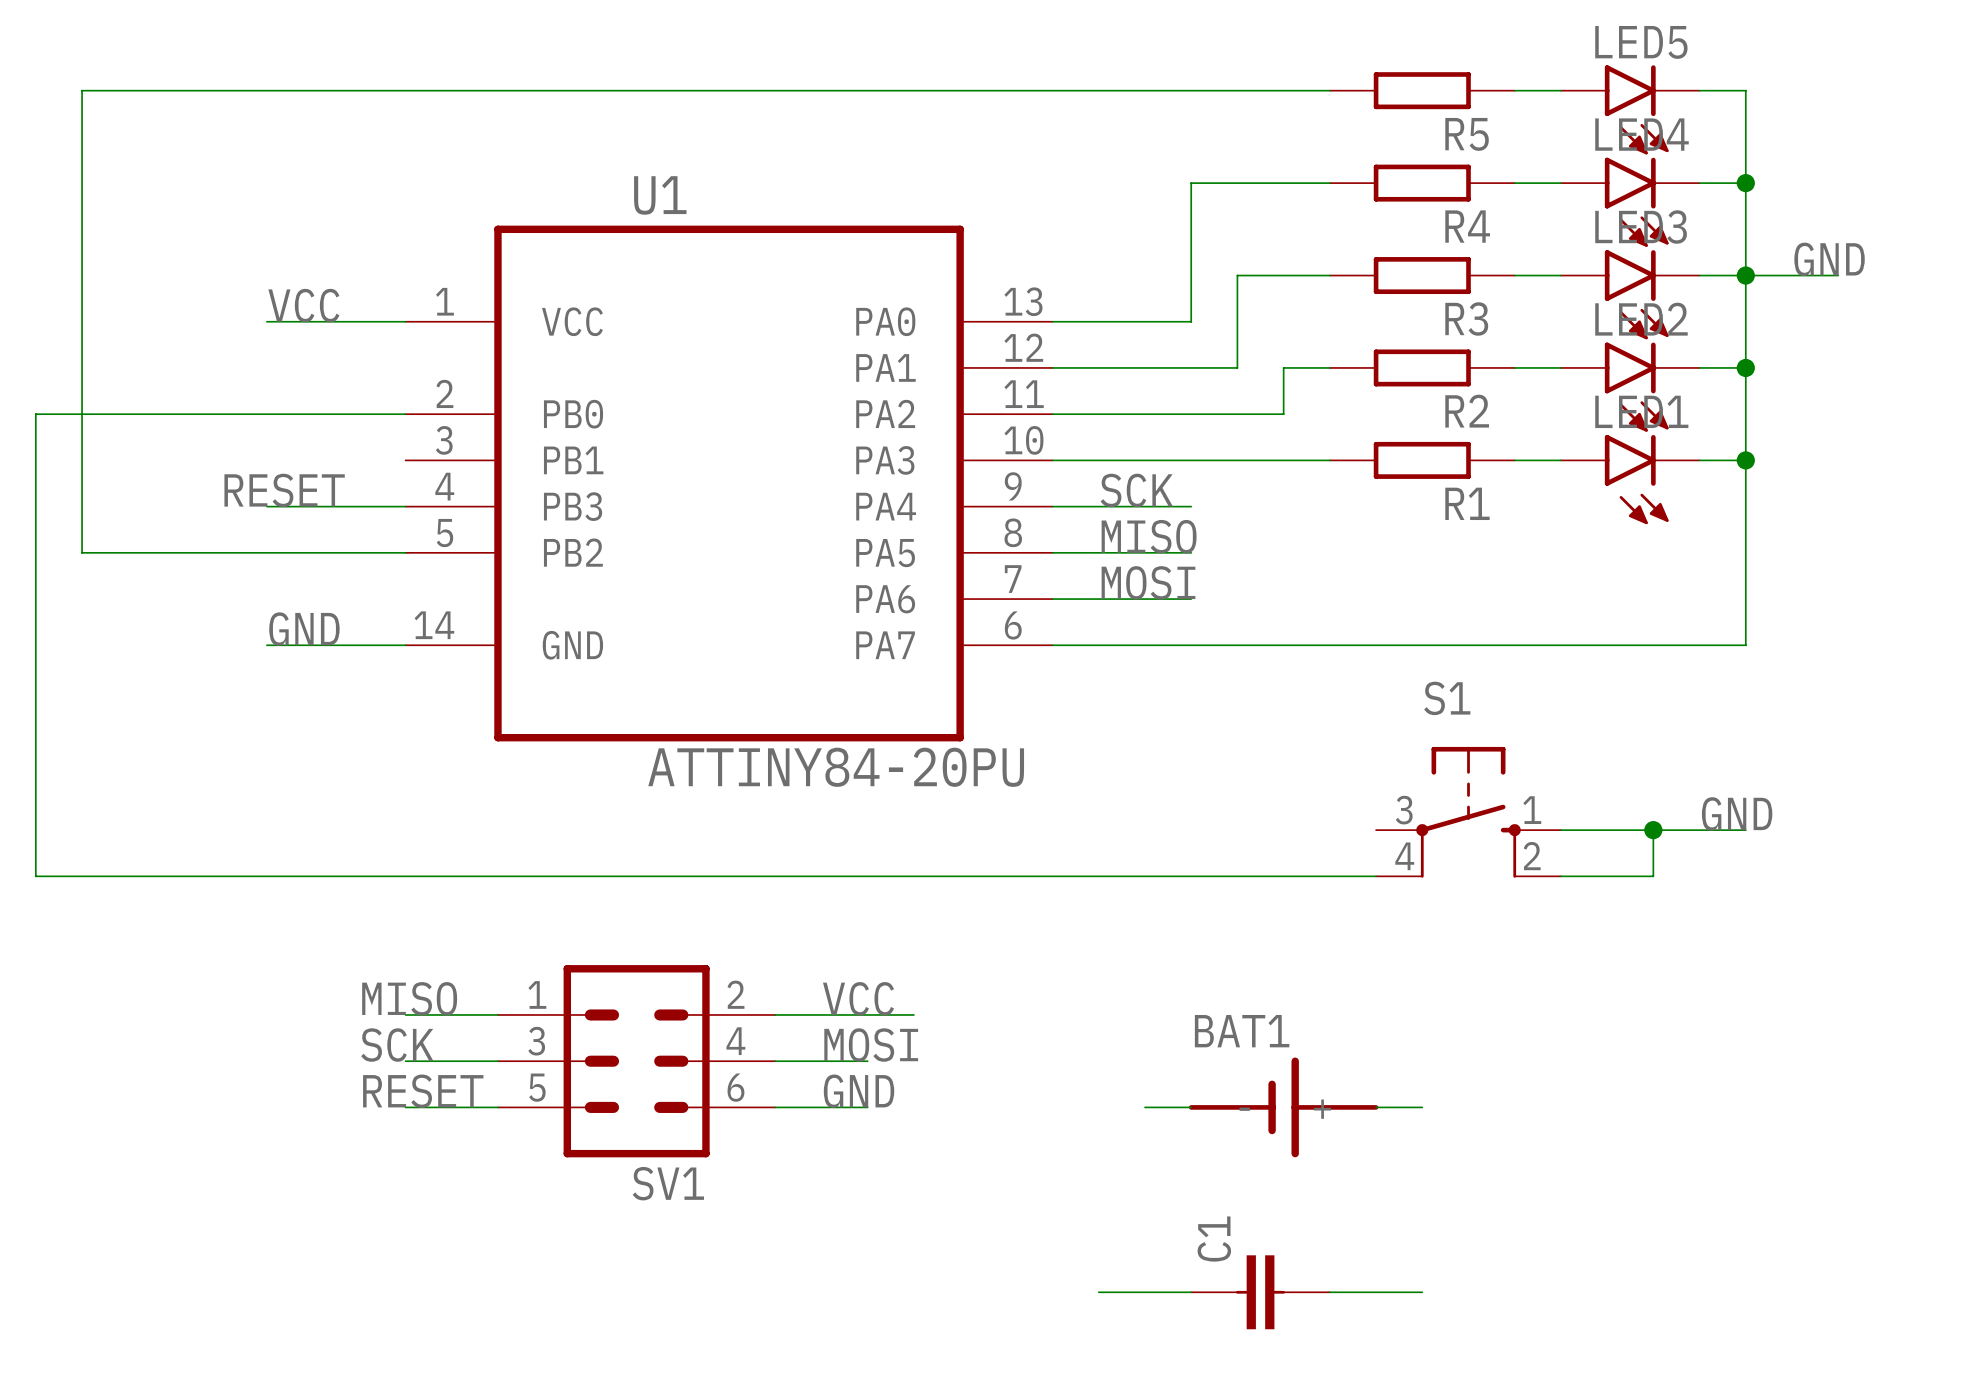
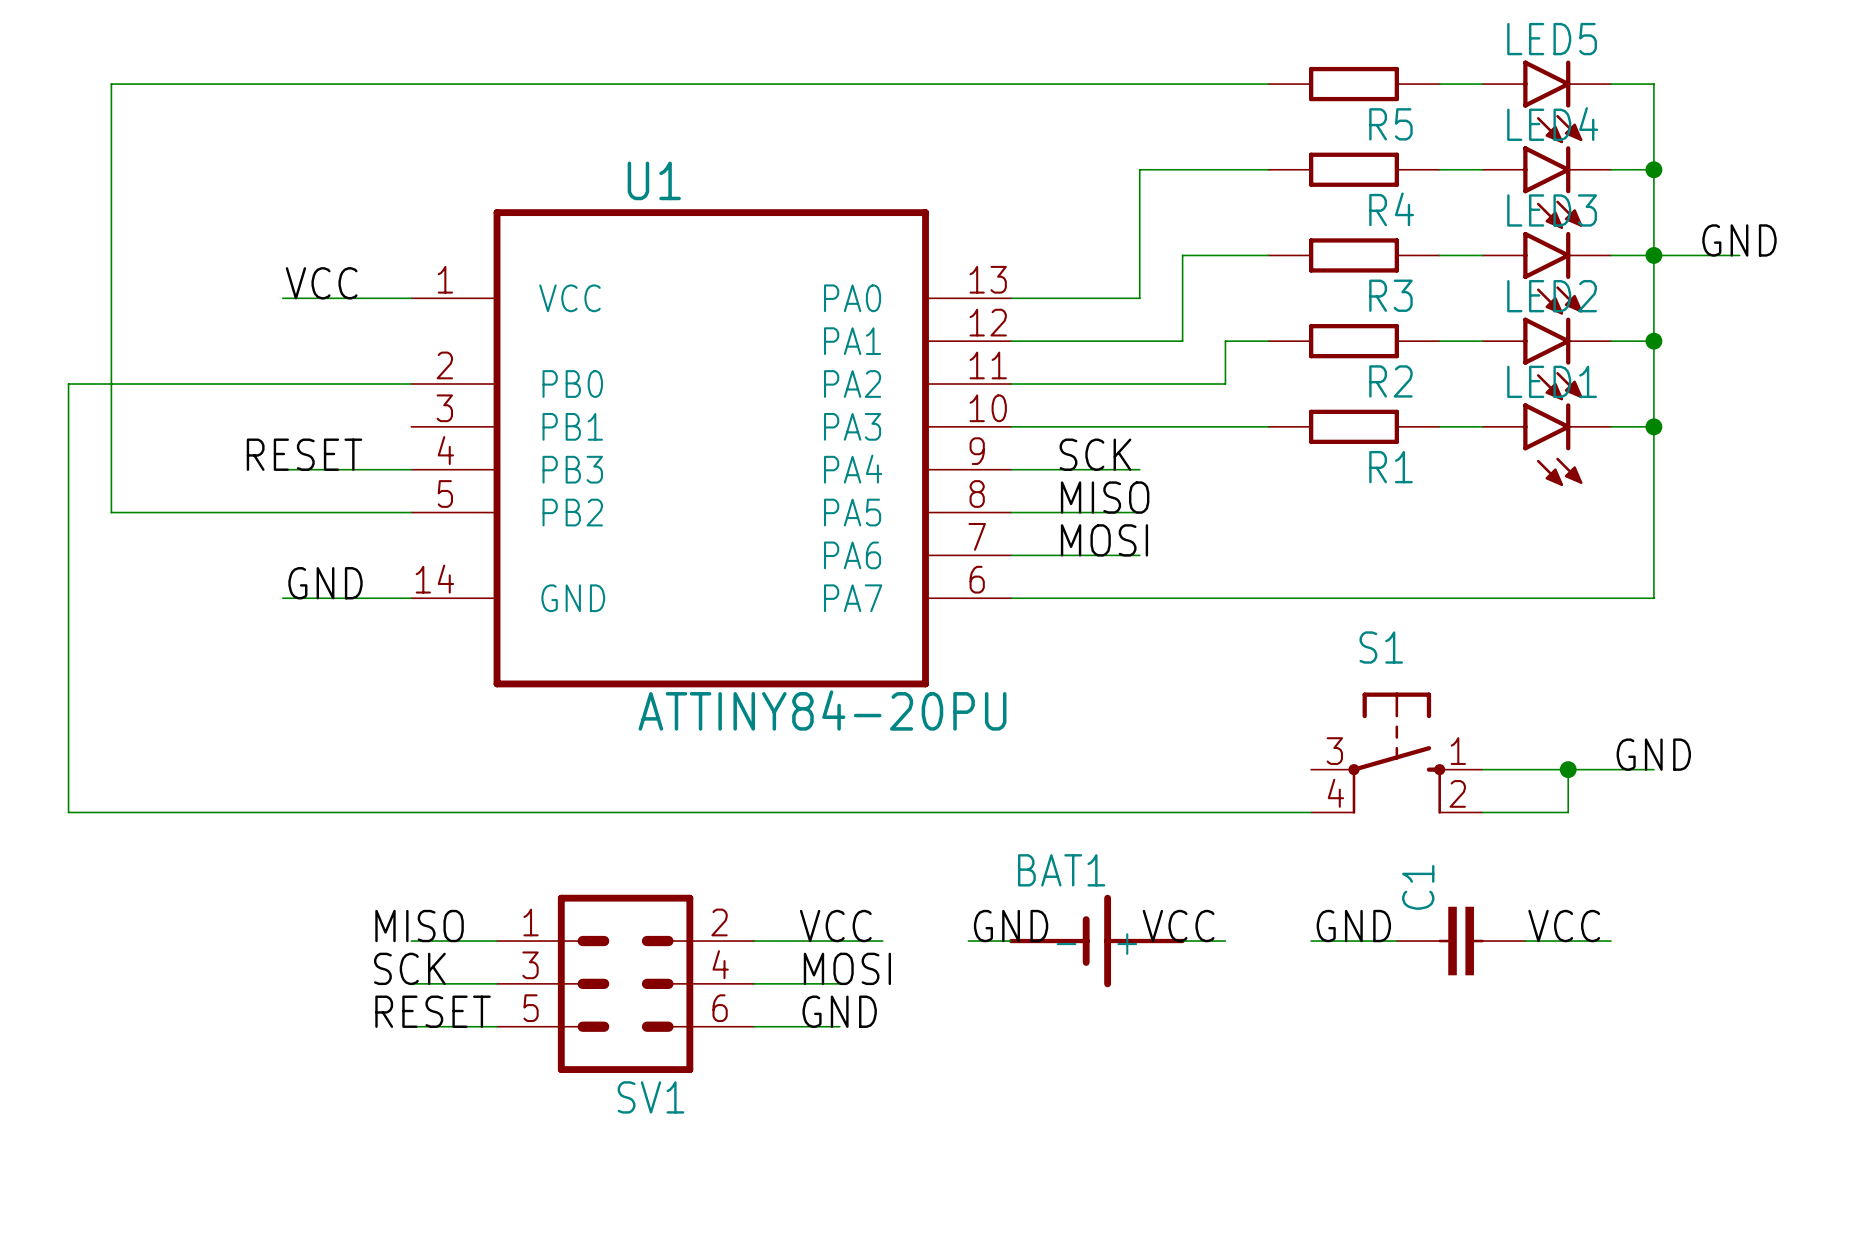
label: none -> GND (1011, 926)
label: none -> VCC (1178, 926)
label: none -> GND (1353, 926)
label: none -> VCC (1564, 926)
wire: (1144, 1107) (1191, 1107) -> (968, 941) (1011, 941)
BAT1 position: (1283, 1107) -> (1096, 941)
wire: (1376, 1107) (1422, 1107) -> (1182, 941) (1225, 941)
wire: (1098, 1292) (1191, 1292) -> (1311, 941) (1396, 941)
C1 position: (1260, 1292) -> (1461, 941)
wire: (1329, 1292) (1422, 1292) -> (1525, 941) (1611, 941)

